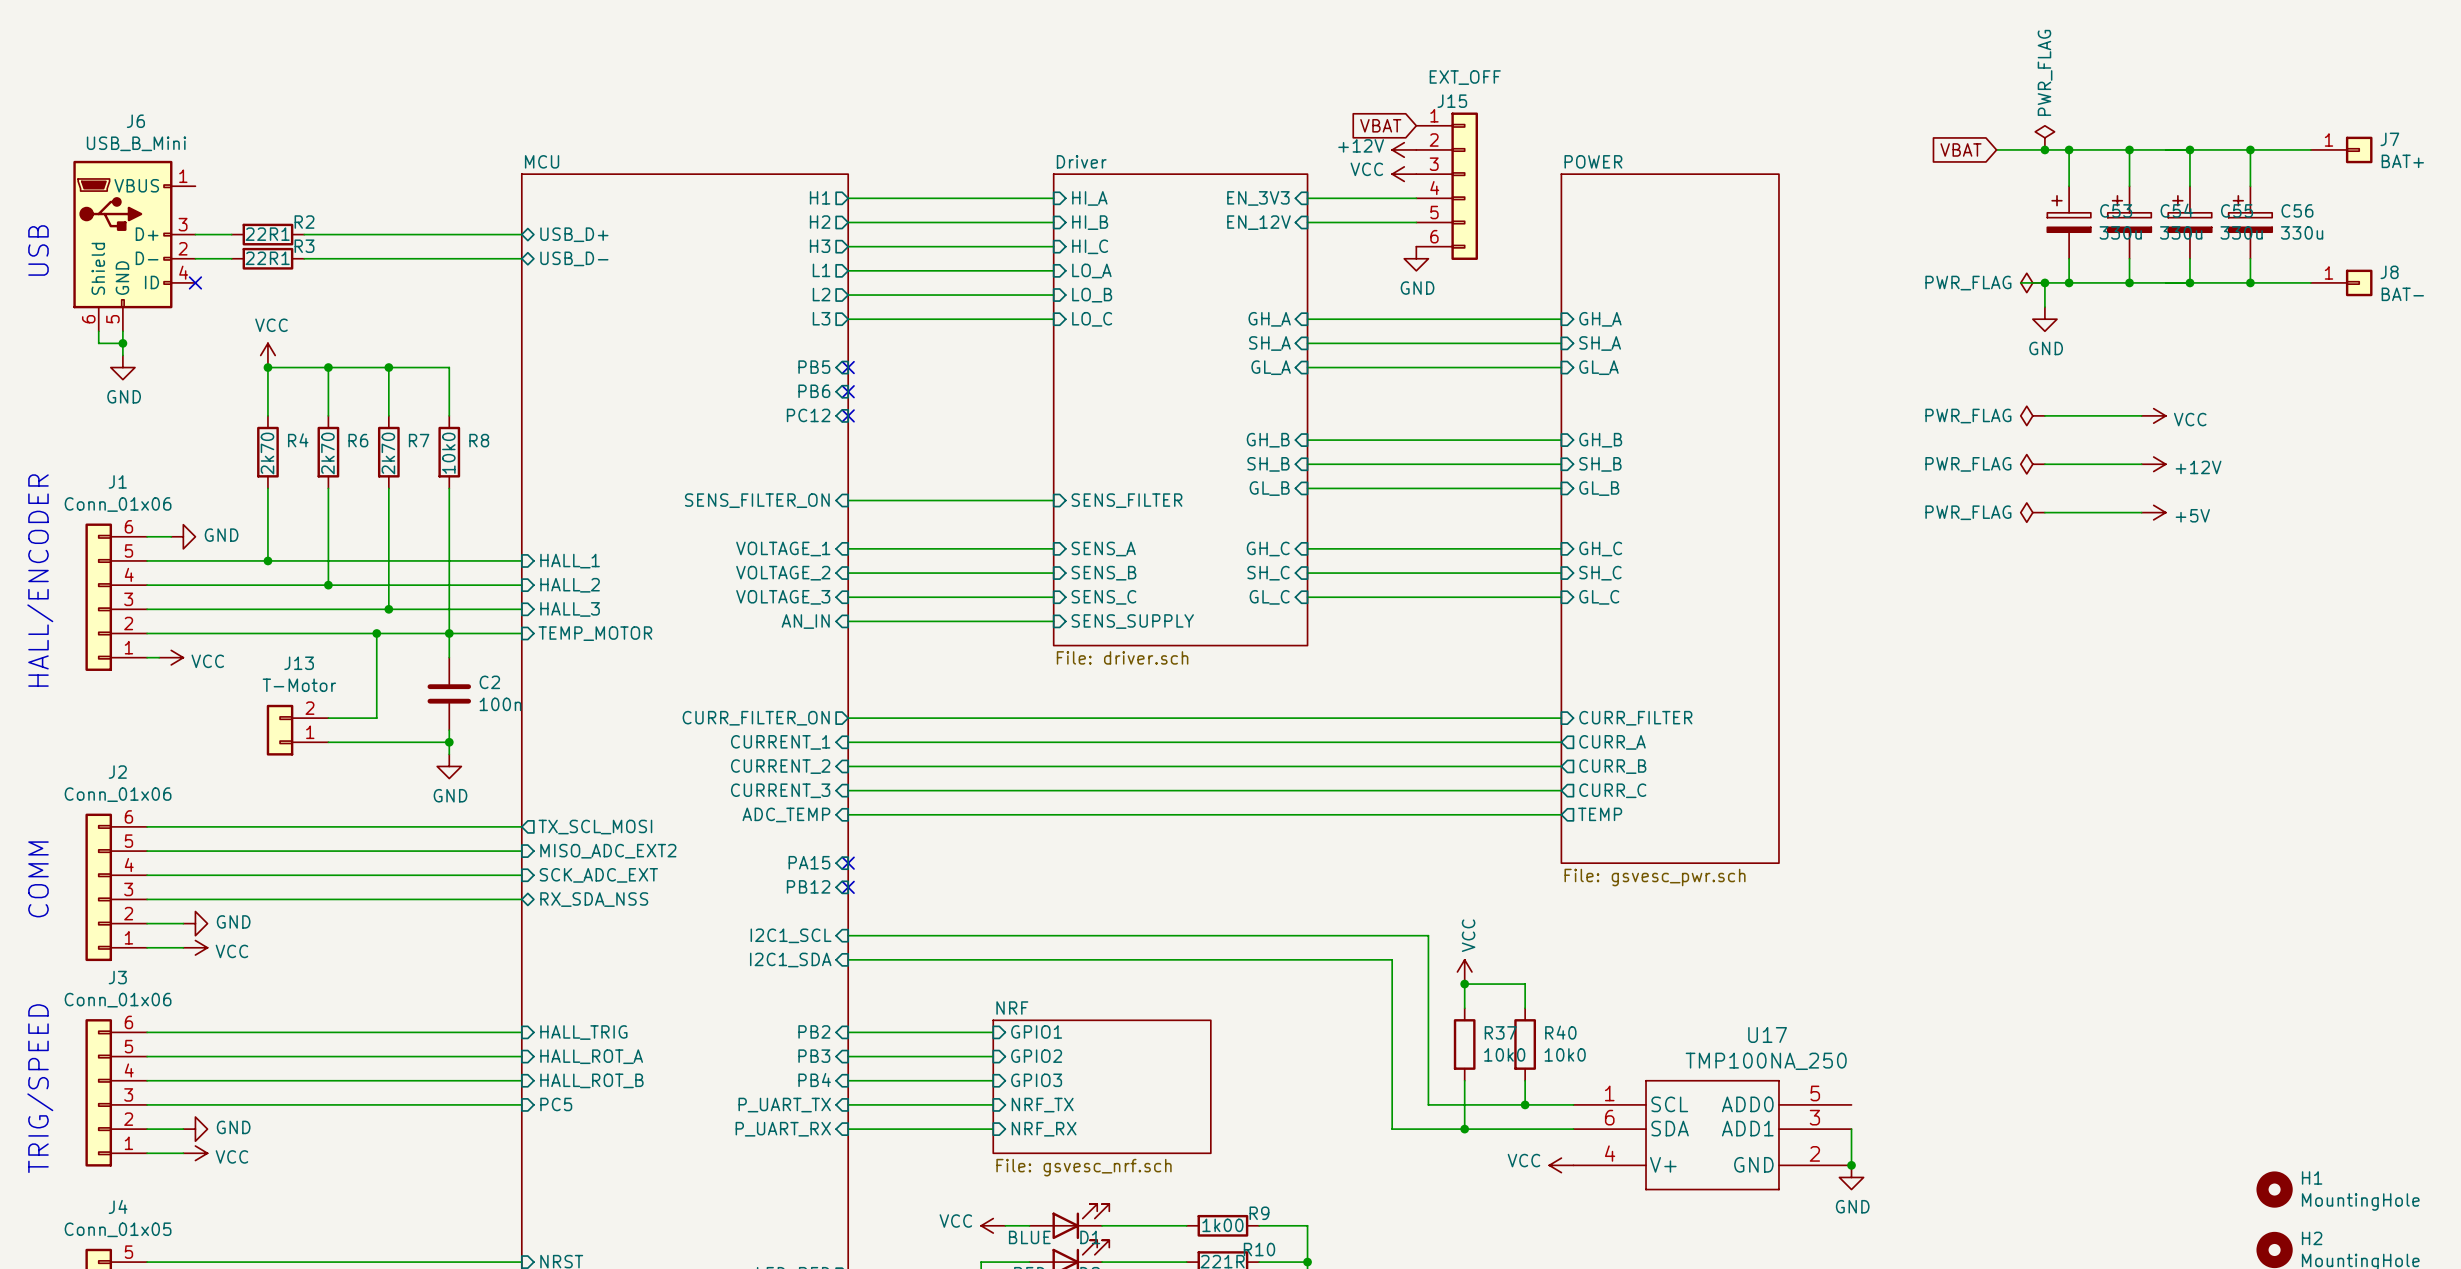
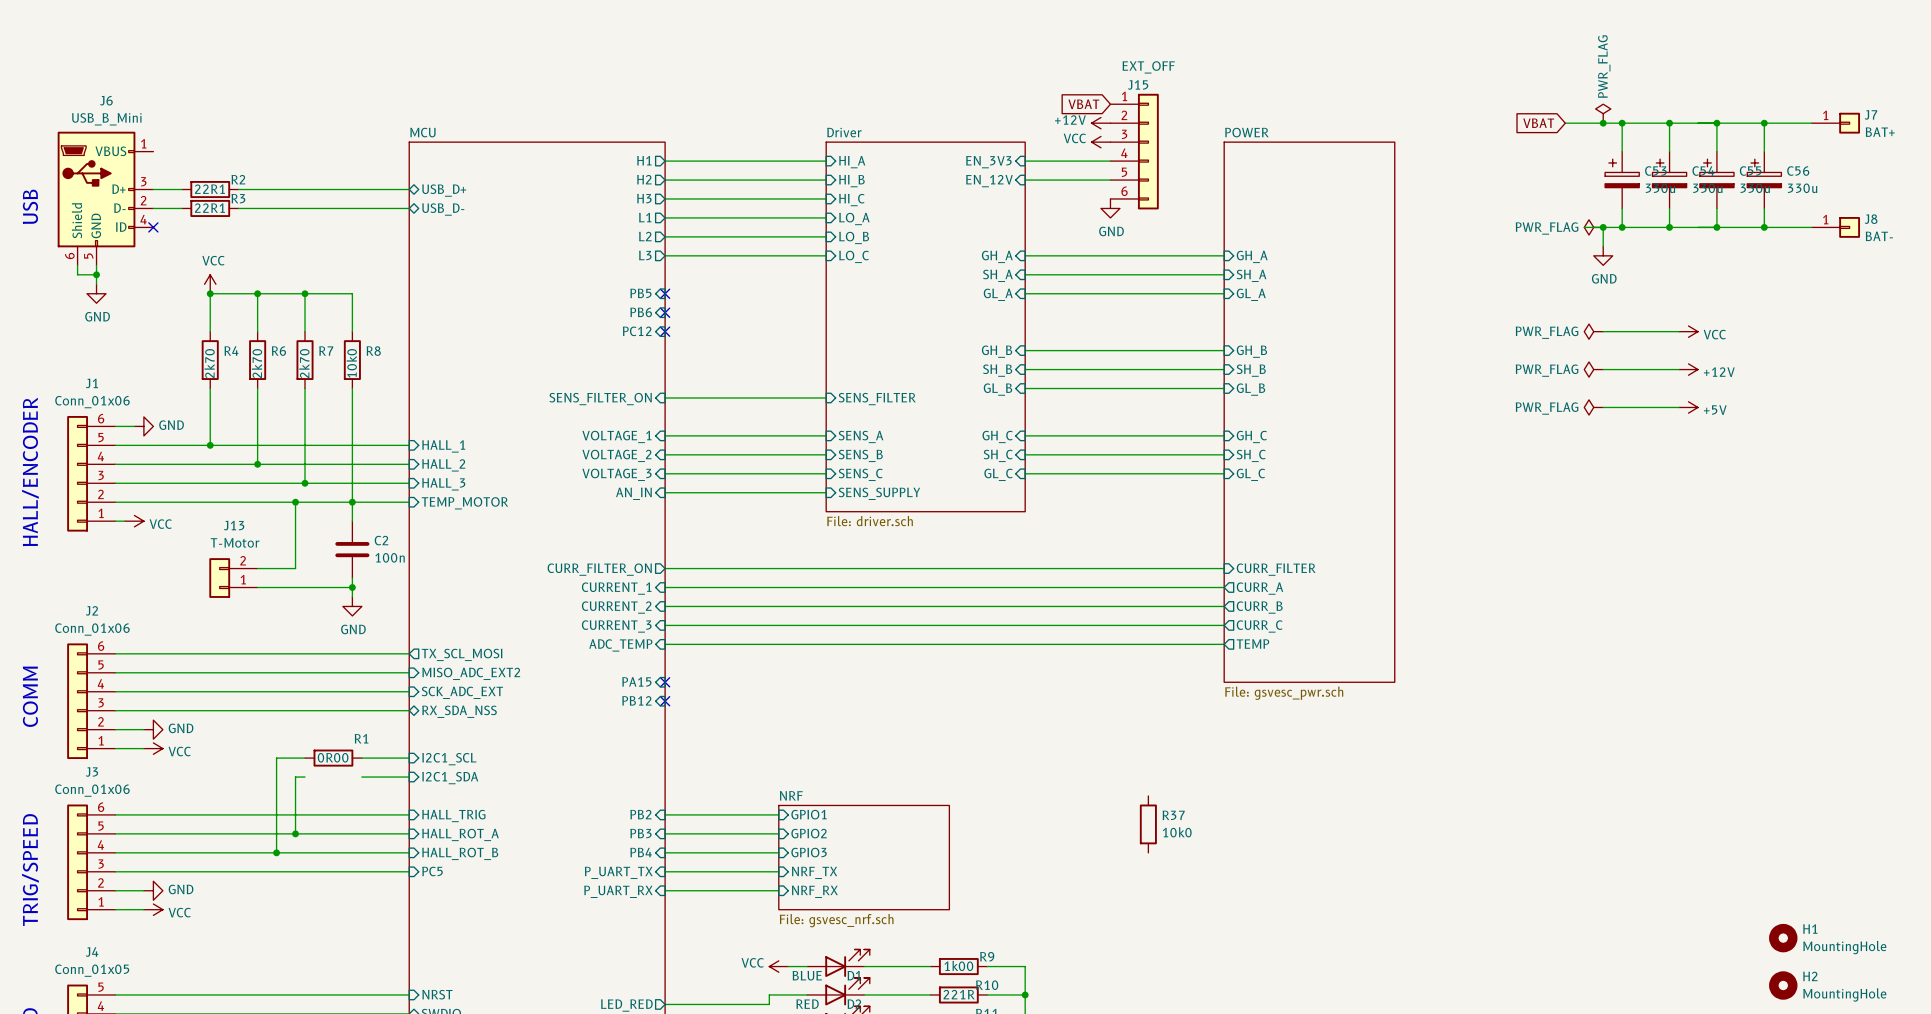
sheet pin: I2C1_SCL (791, 935) -> none
wire: (848, 935) (1428, 935) (1428, 1104) (1573, 1104) -> none
wire: none -> (305, 758) (276, 758) (276, 852)
R1: none -> 0R00 (333, 758)
wire: none -> (361, 758) (409, 758)
sheet pin: none -> I2C1_SCL (449, 759)
sheet pin: I2C1_SDA (790, 959) -> none
wire: (848, 959) (1392, 959) (1392, 1129) (1573, 1129) -> none
power symbol: VCC (1464, 971) -> none
wire: none -> (305, 777) (295, 777) (295, 833)
wire: none -> (361, 777) (409, 777)
sheet pin: none -> I2C1_SDA (450, 778)
junction: (1464, 984) -> none
wire: (1464, 1008) (1464, 984) (1525, 984) (1525, 1008) -> none
R40: 10k0 (1525, 1044) -> none
junction: none -> (295, 833)
junction: none -> (276, 852)
wire: (1464, 1080) (1464, 1129) -> none
wire: (1525, 1080) (1525, 1104) -> none
junction: (1525, 1104) -> none
junction: (1464, 1129) -> none
wire: (1851, 1129) (1851, 1165) -> none
U17: TMP100NA_250 (1712, 1135) -> none
power symbol: VCC (1561, 1165) -> none
junction: (1851, 1165) -> none
power symbol: GND (1851, 1177) -> none

